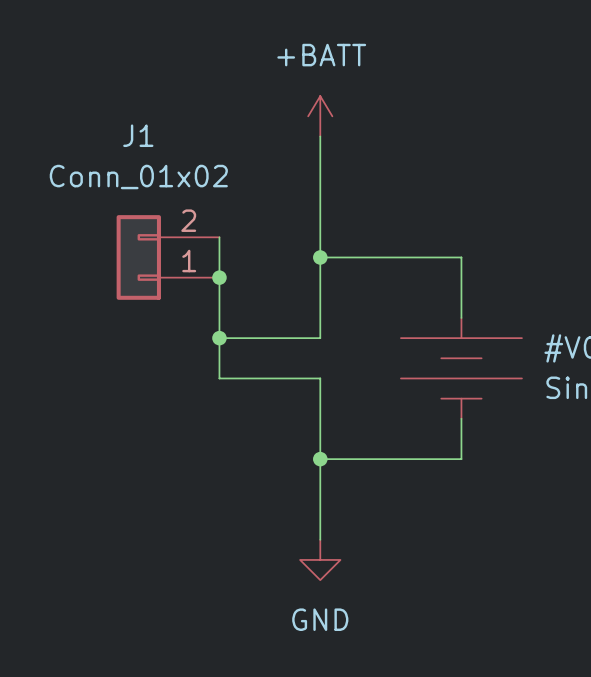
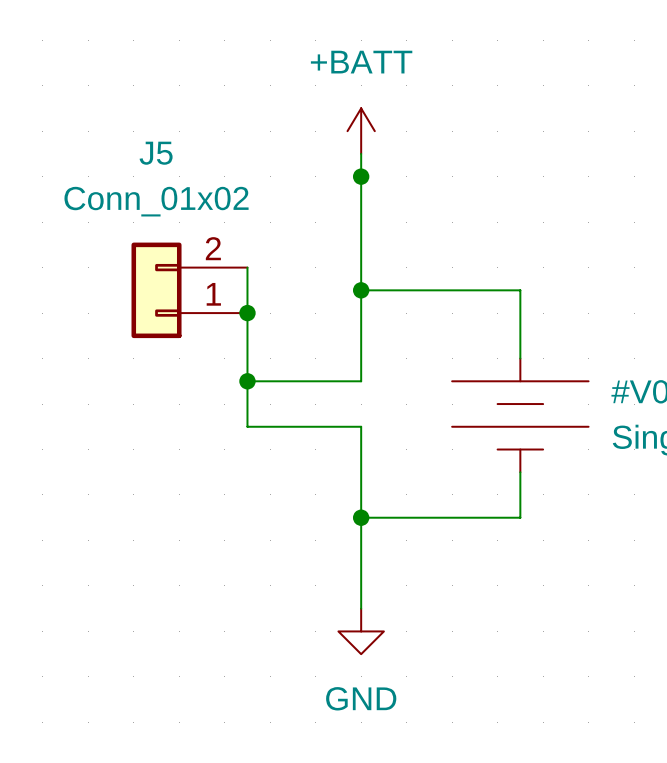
J1 name: J1 (138, 135) -> J5 (156, 153)
junction: none -> (361, 176)

